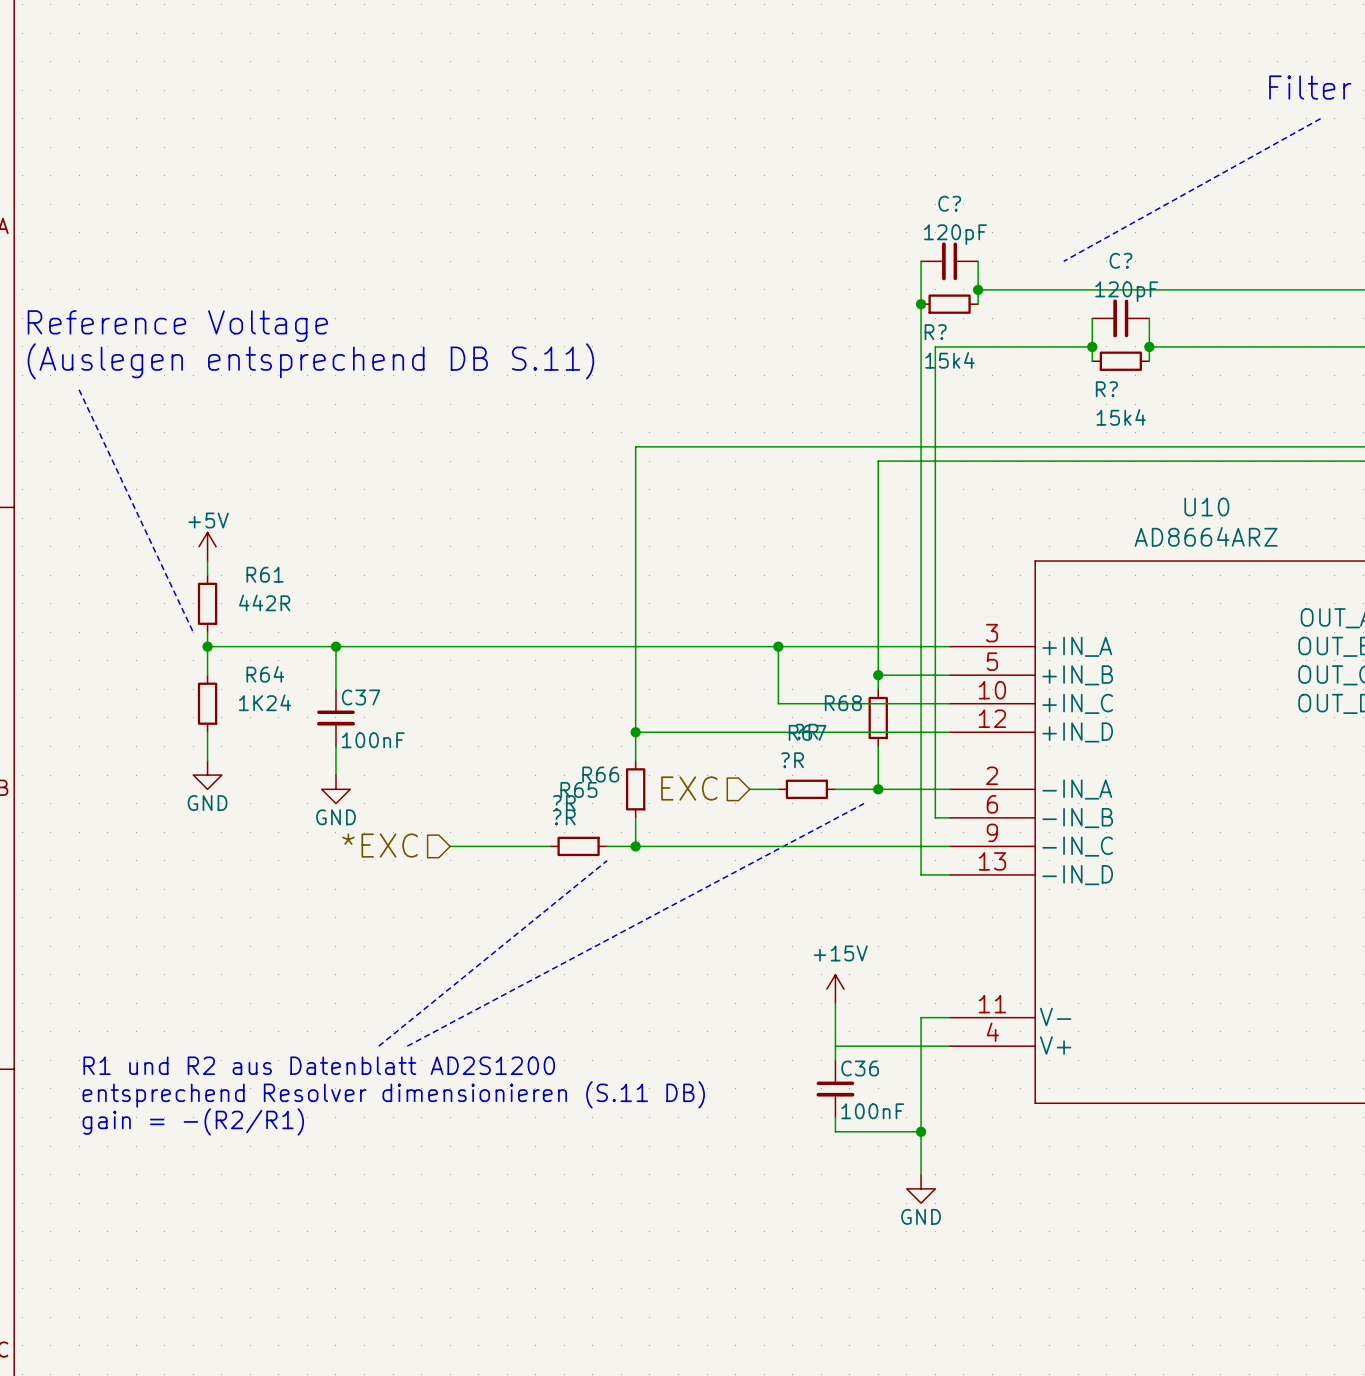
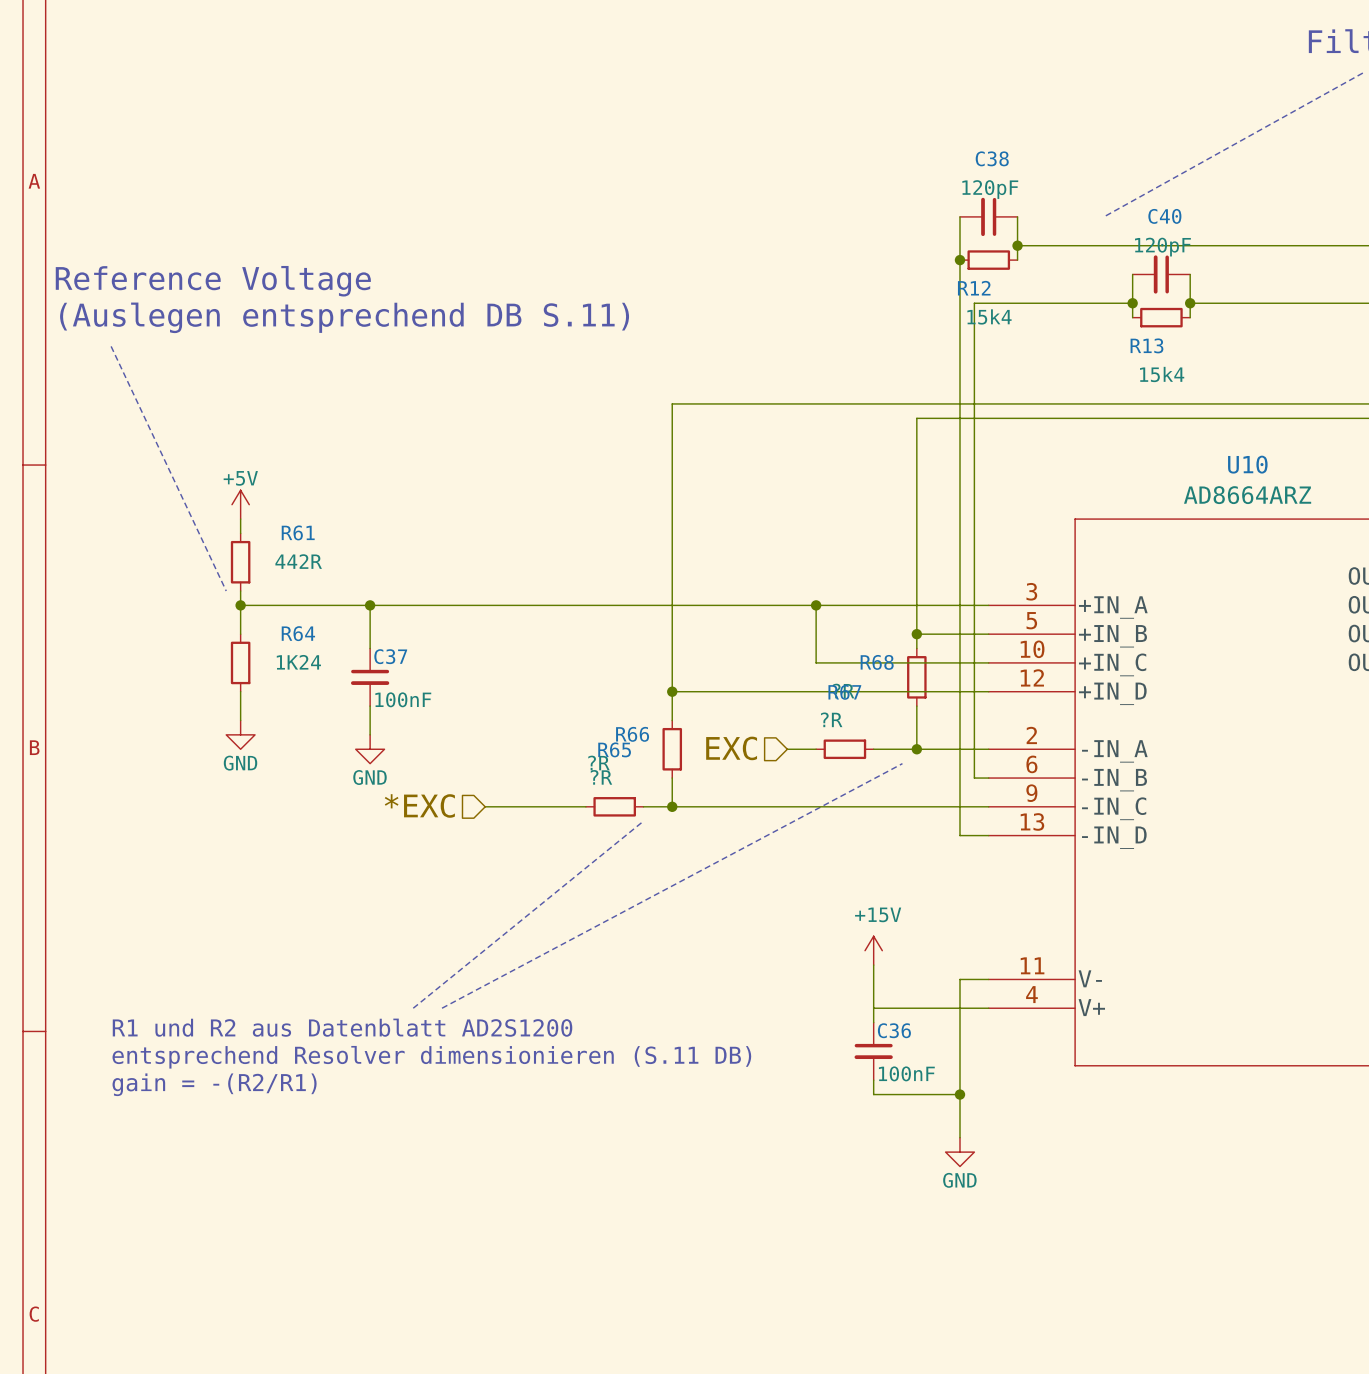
C? name: C? (949, 203) -> C38 (992, 158)
C? name: C? (1120, 260) -> C40 (1164, 216)
R? name: R? (935, 332) -> R12 (974, 288)
R? name: R? (1106, 389) -> R13 (1146, 345)

